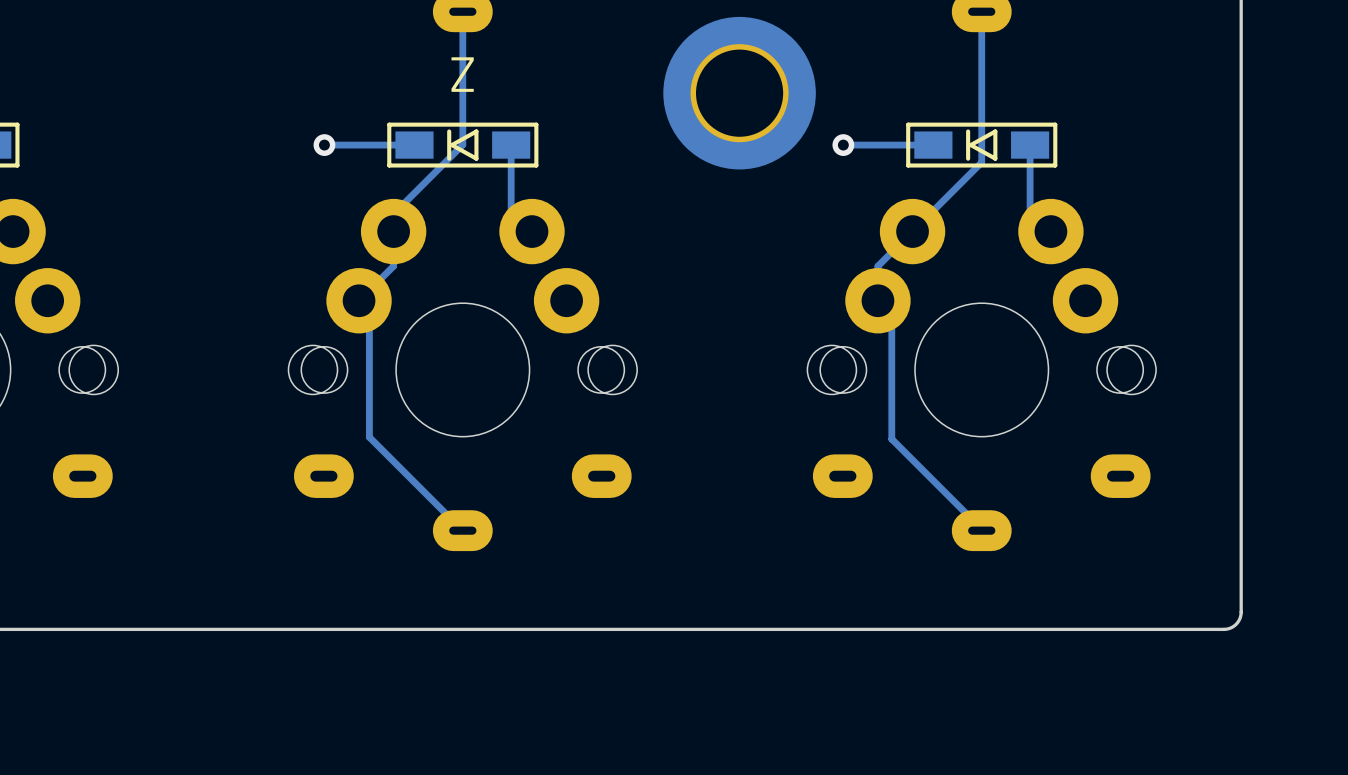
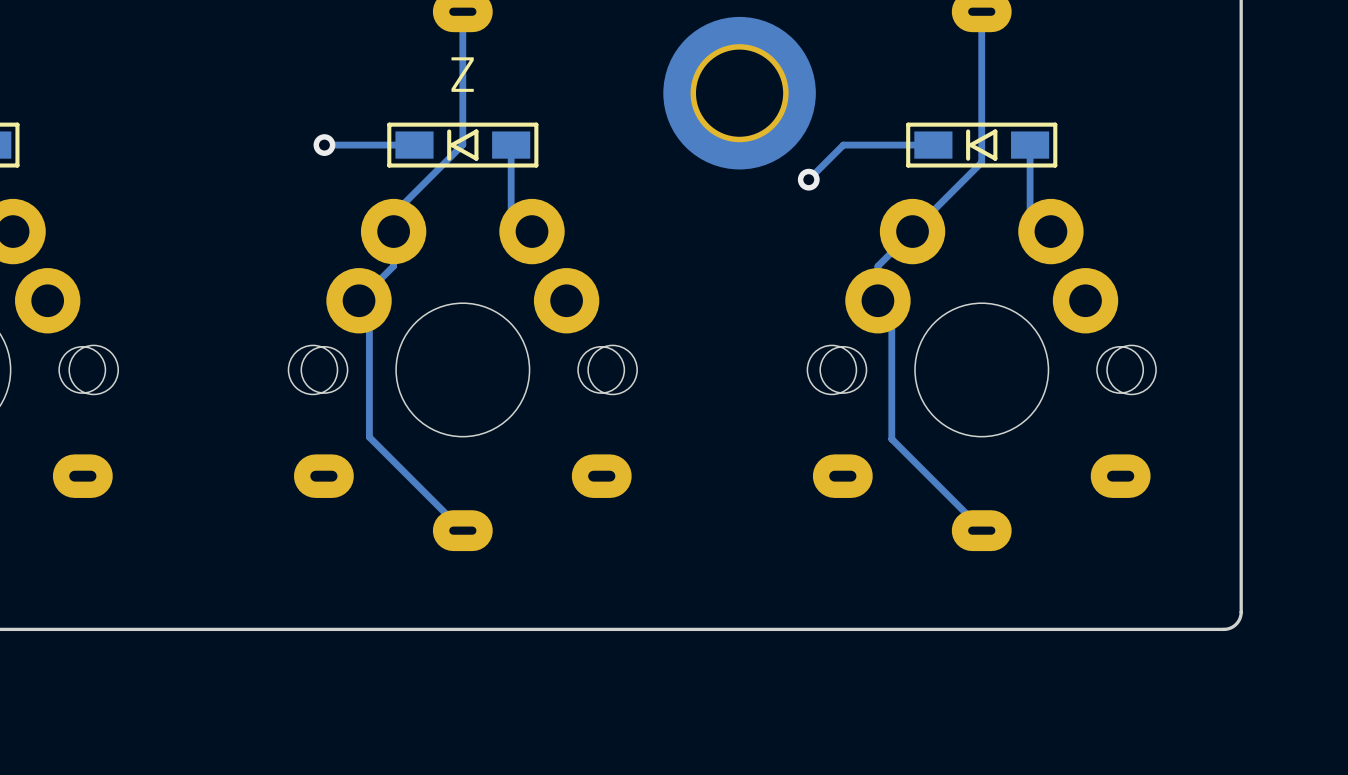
track: none -> (843, 145) (808, 179)
via position: (843, 145) -> (808, 179)

